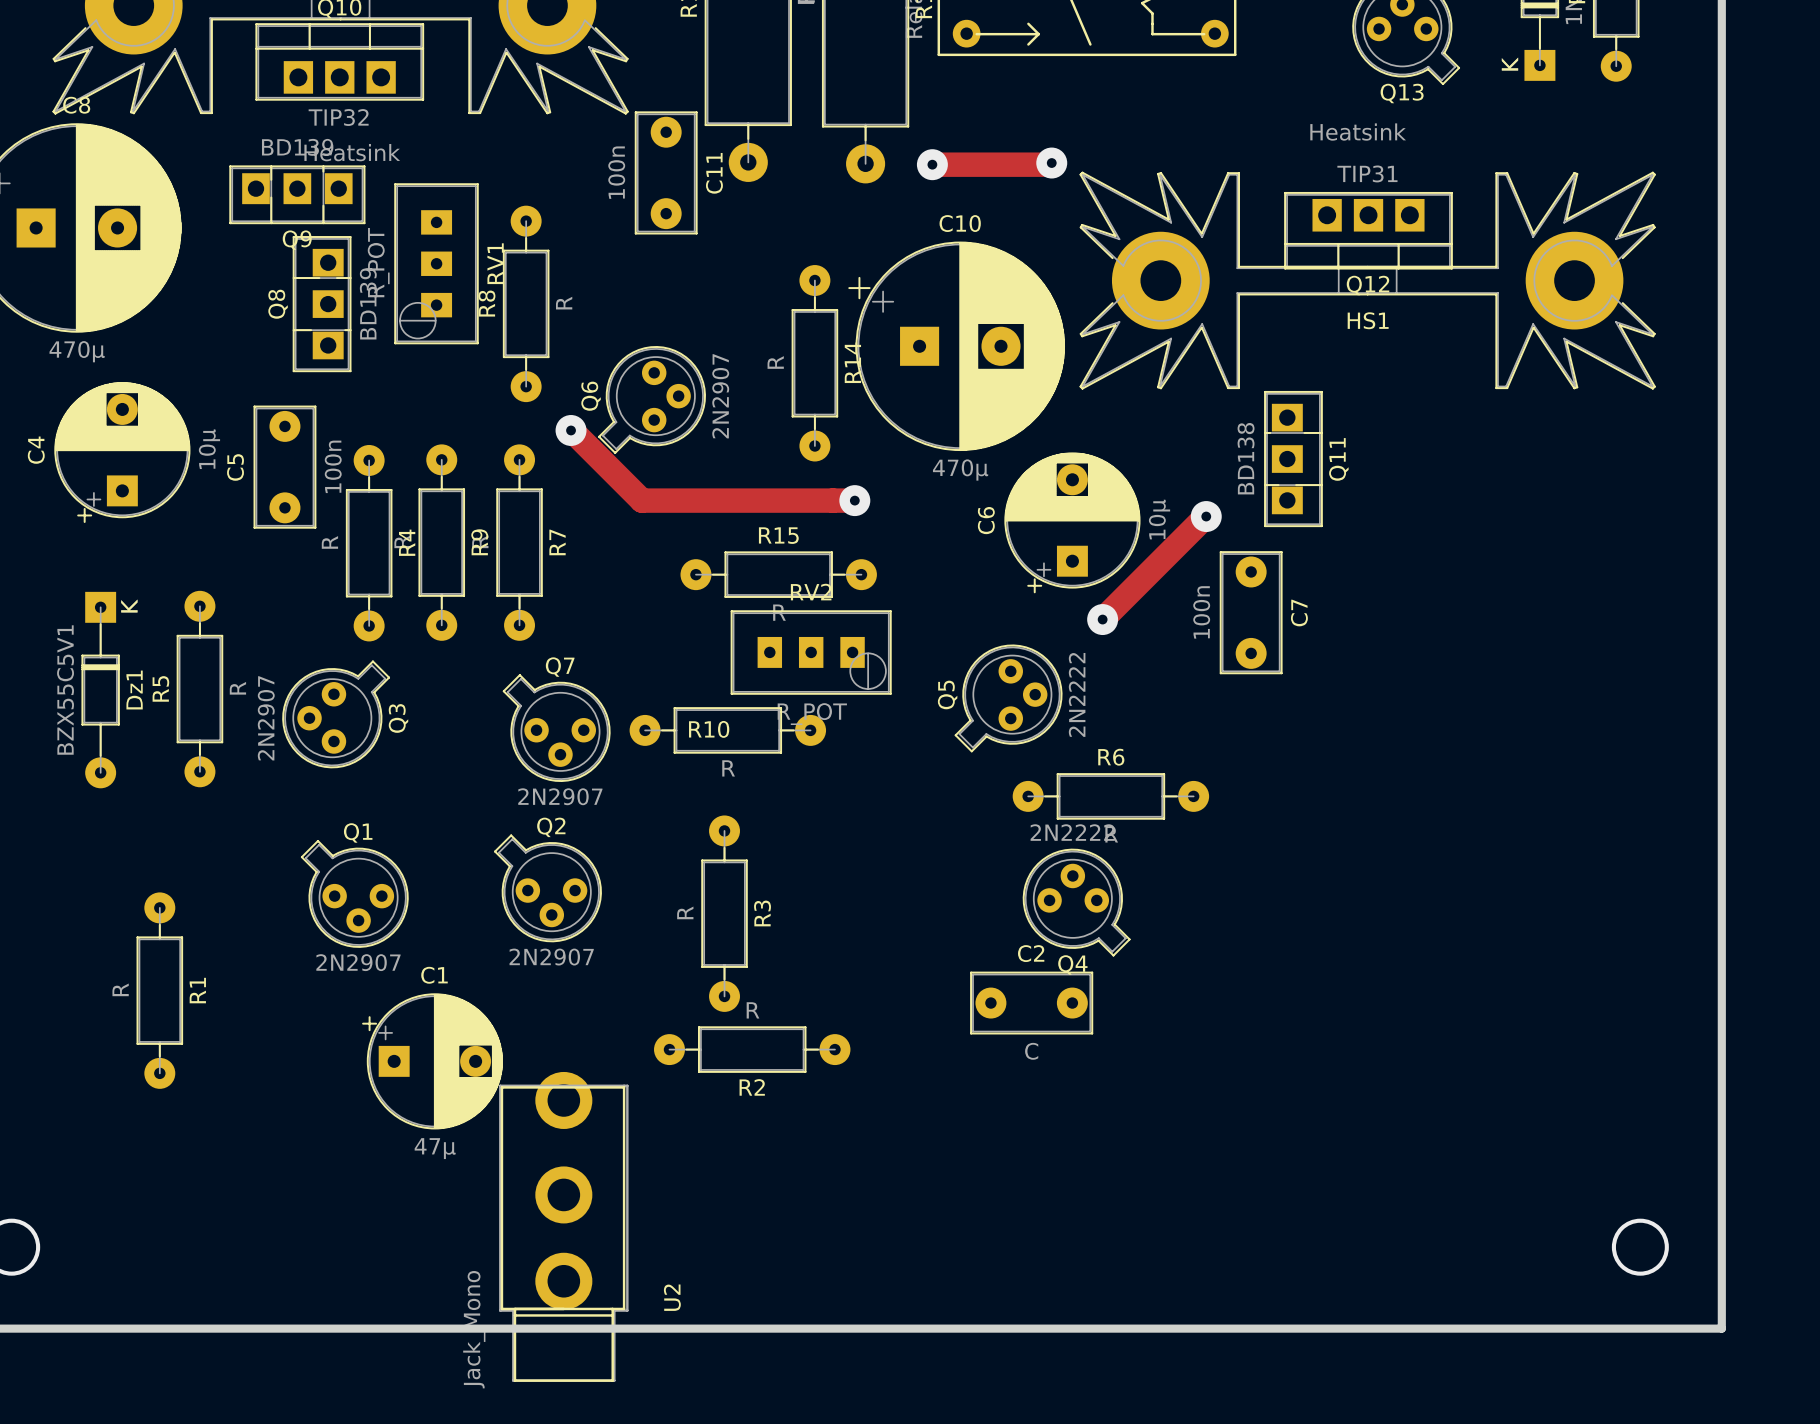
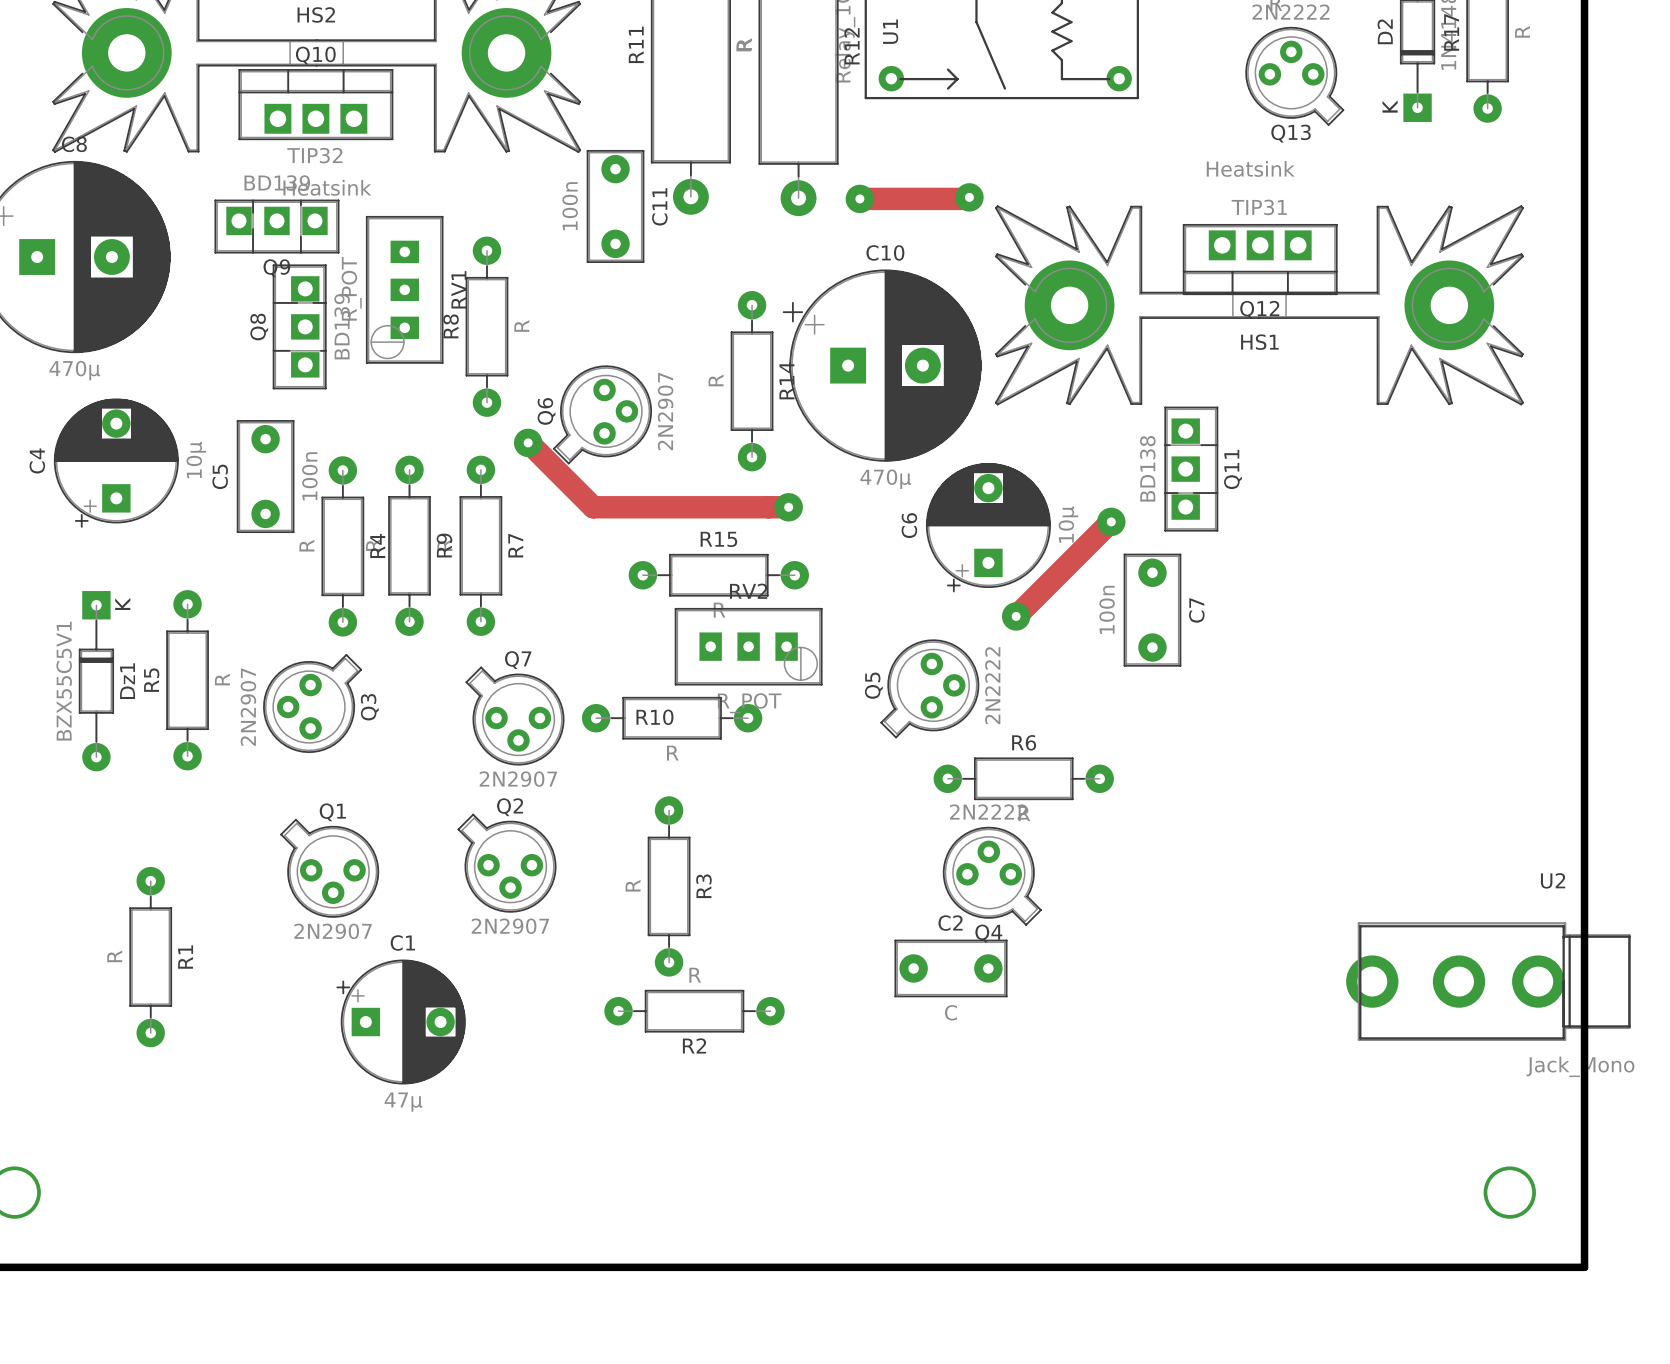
U2 rotation: 0° (563, 1226) -> 90° counterclockwise (1488, 981)
U2 position: (563, 1226) -> (1488, 981)

